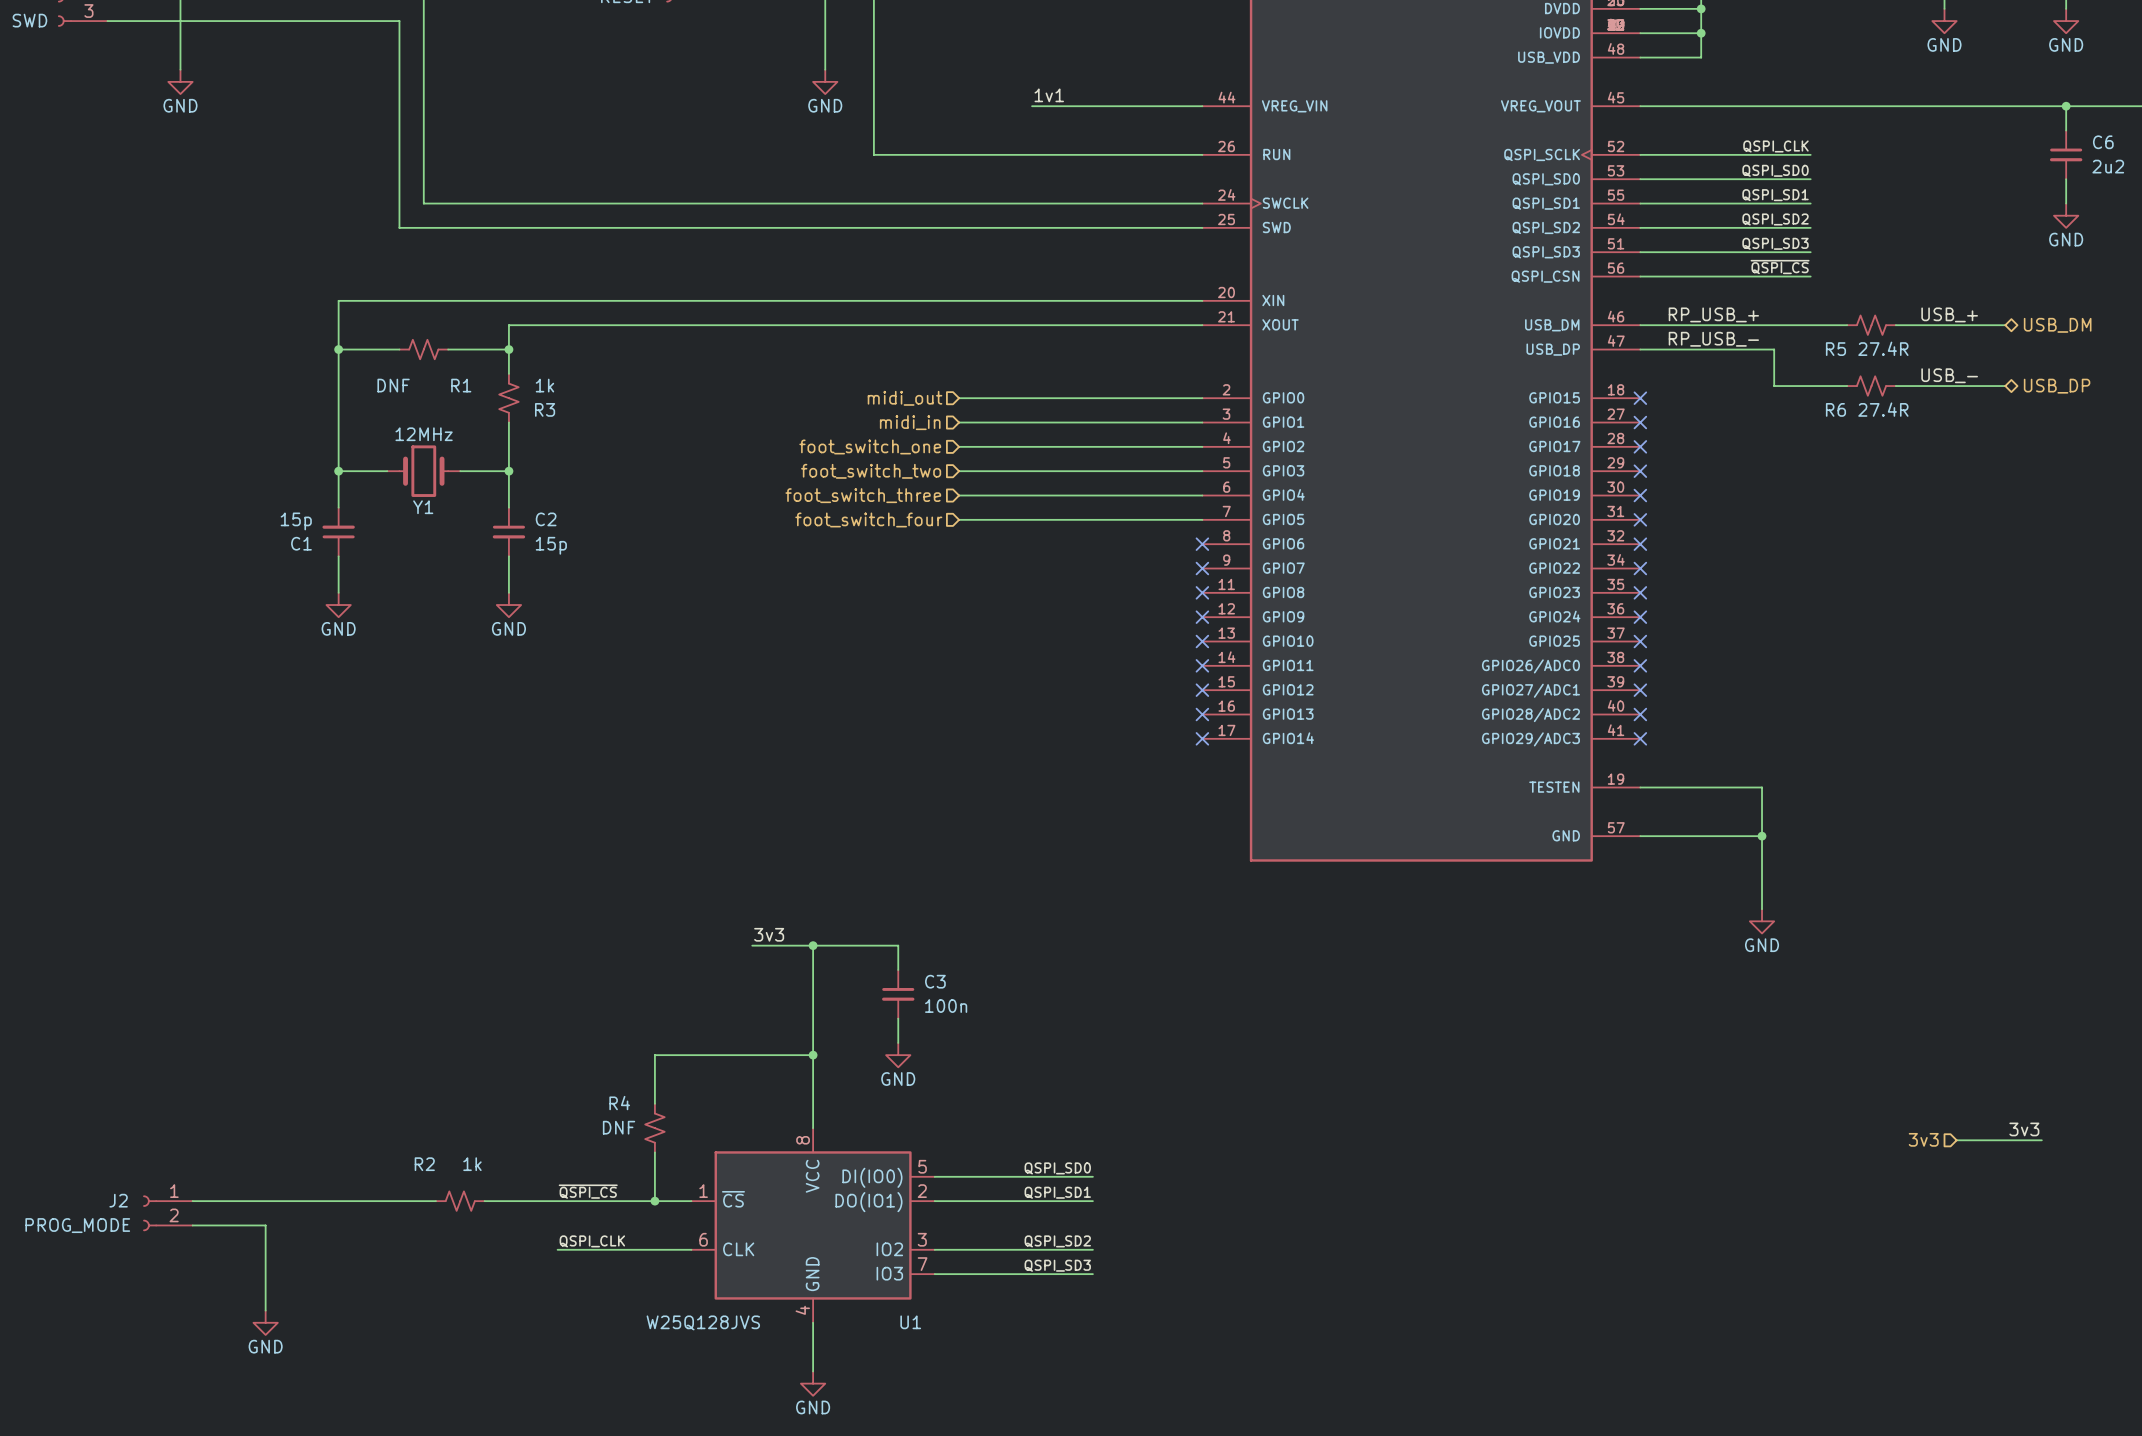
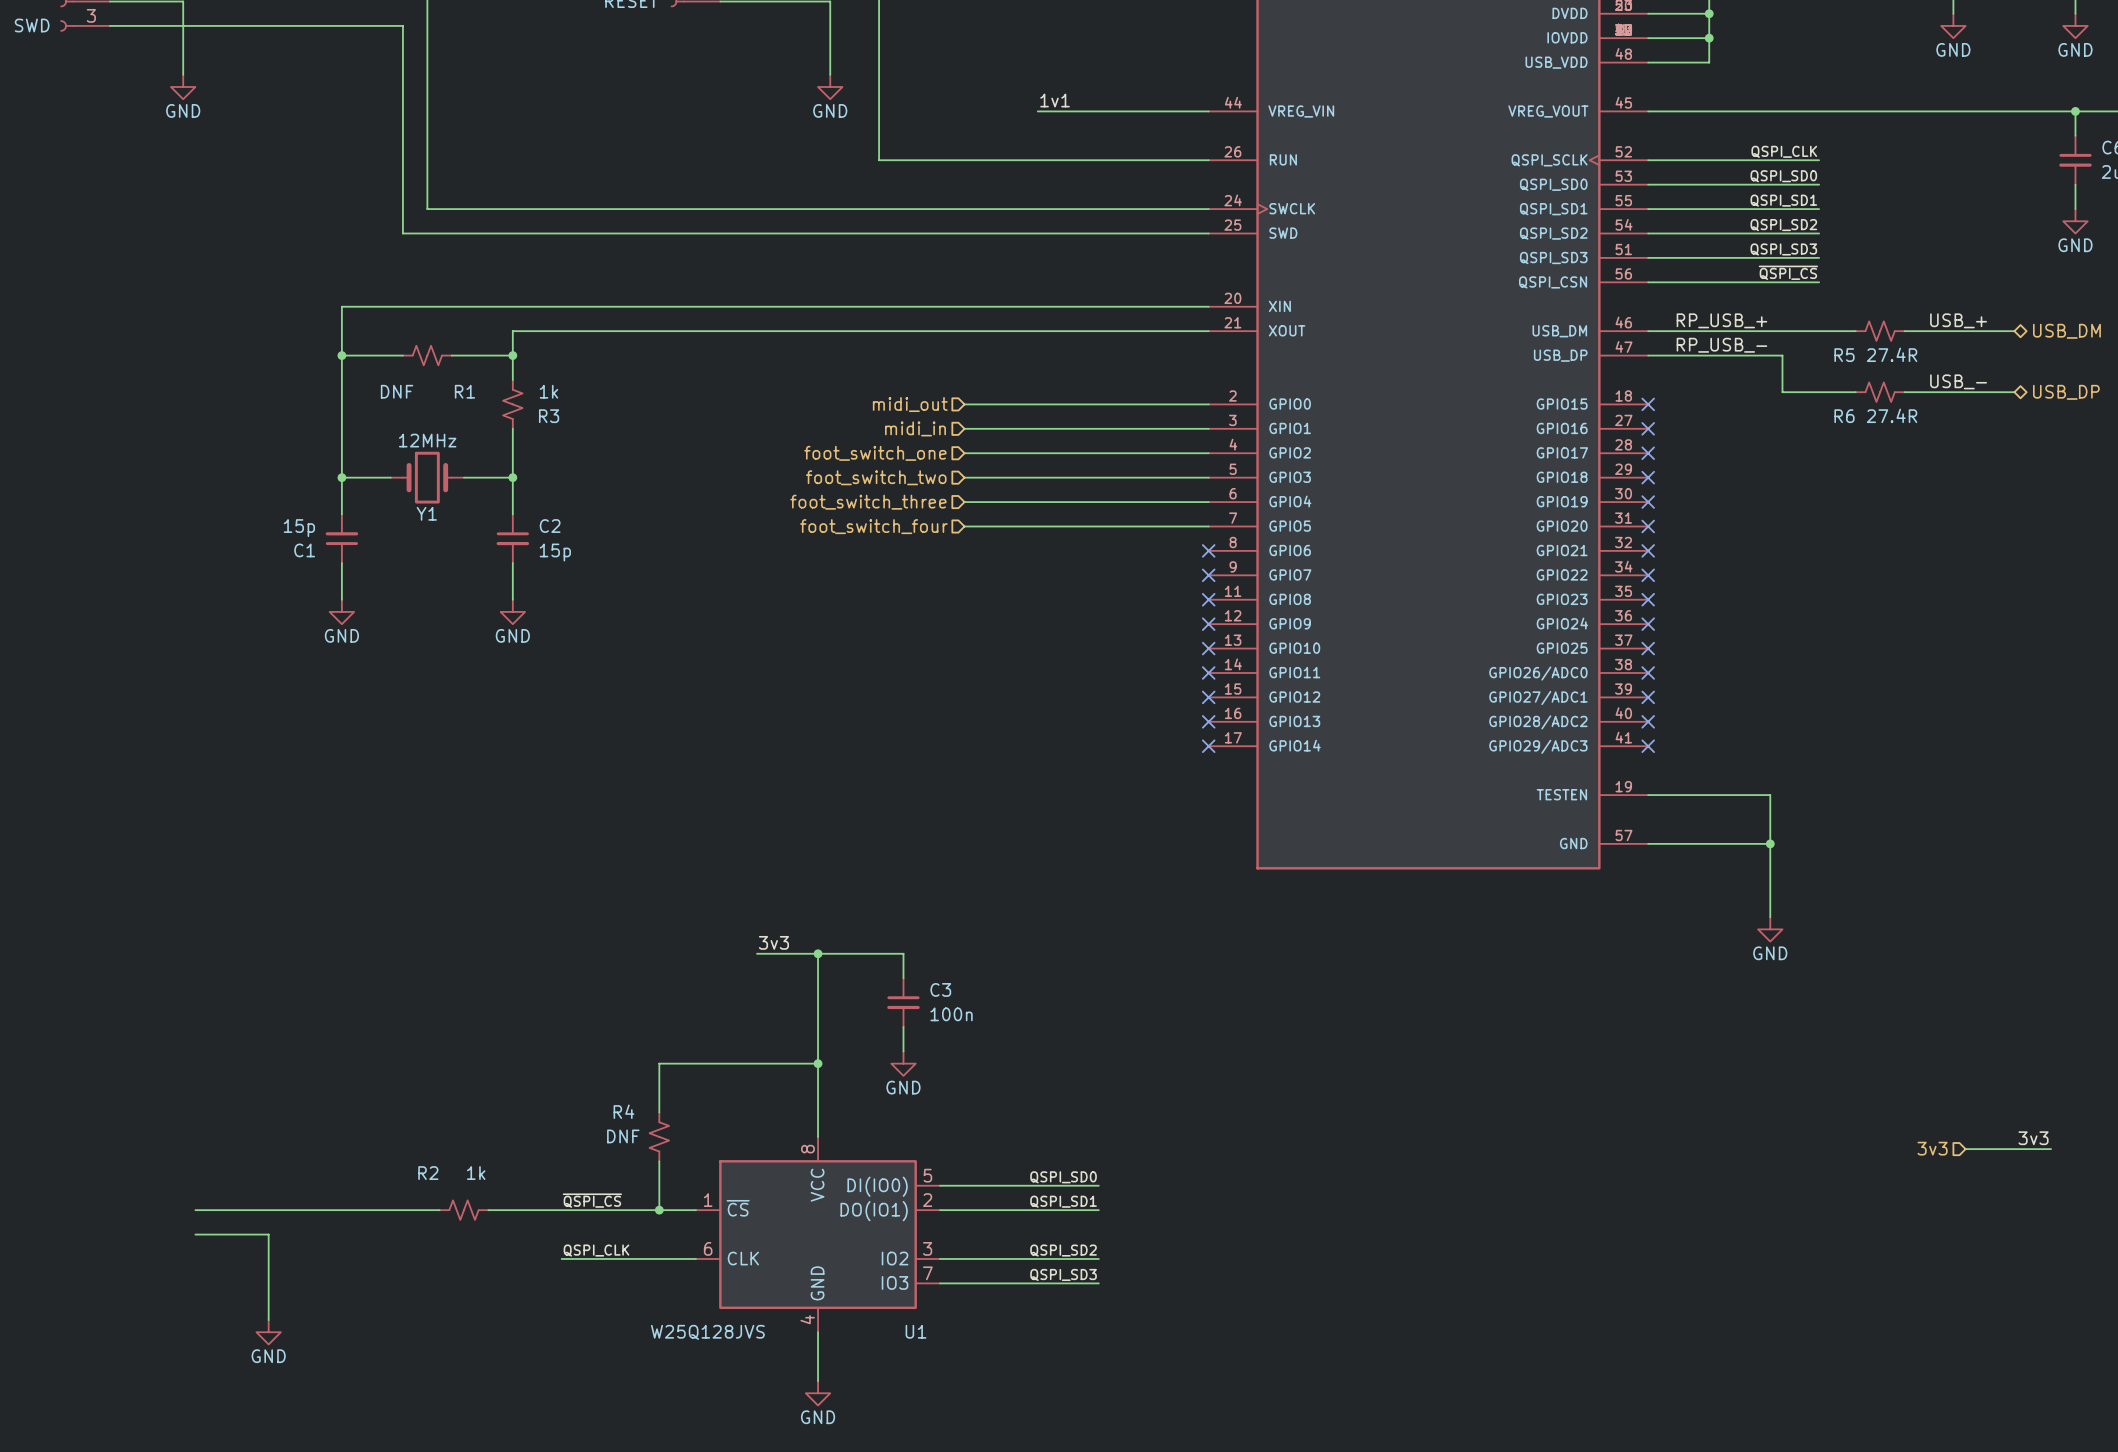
J2: PROG_MODE (167, 1213) -> none

